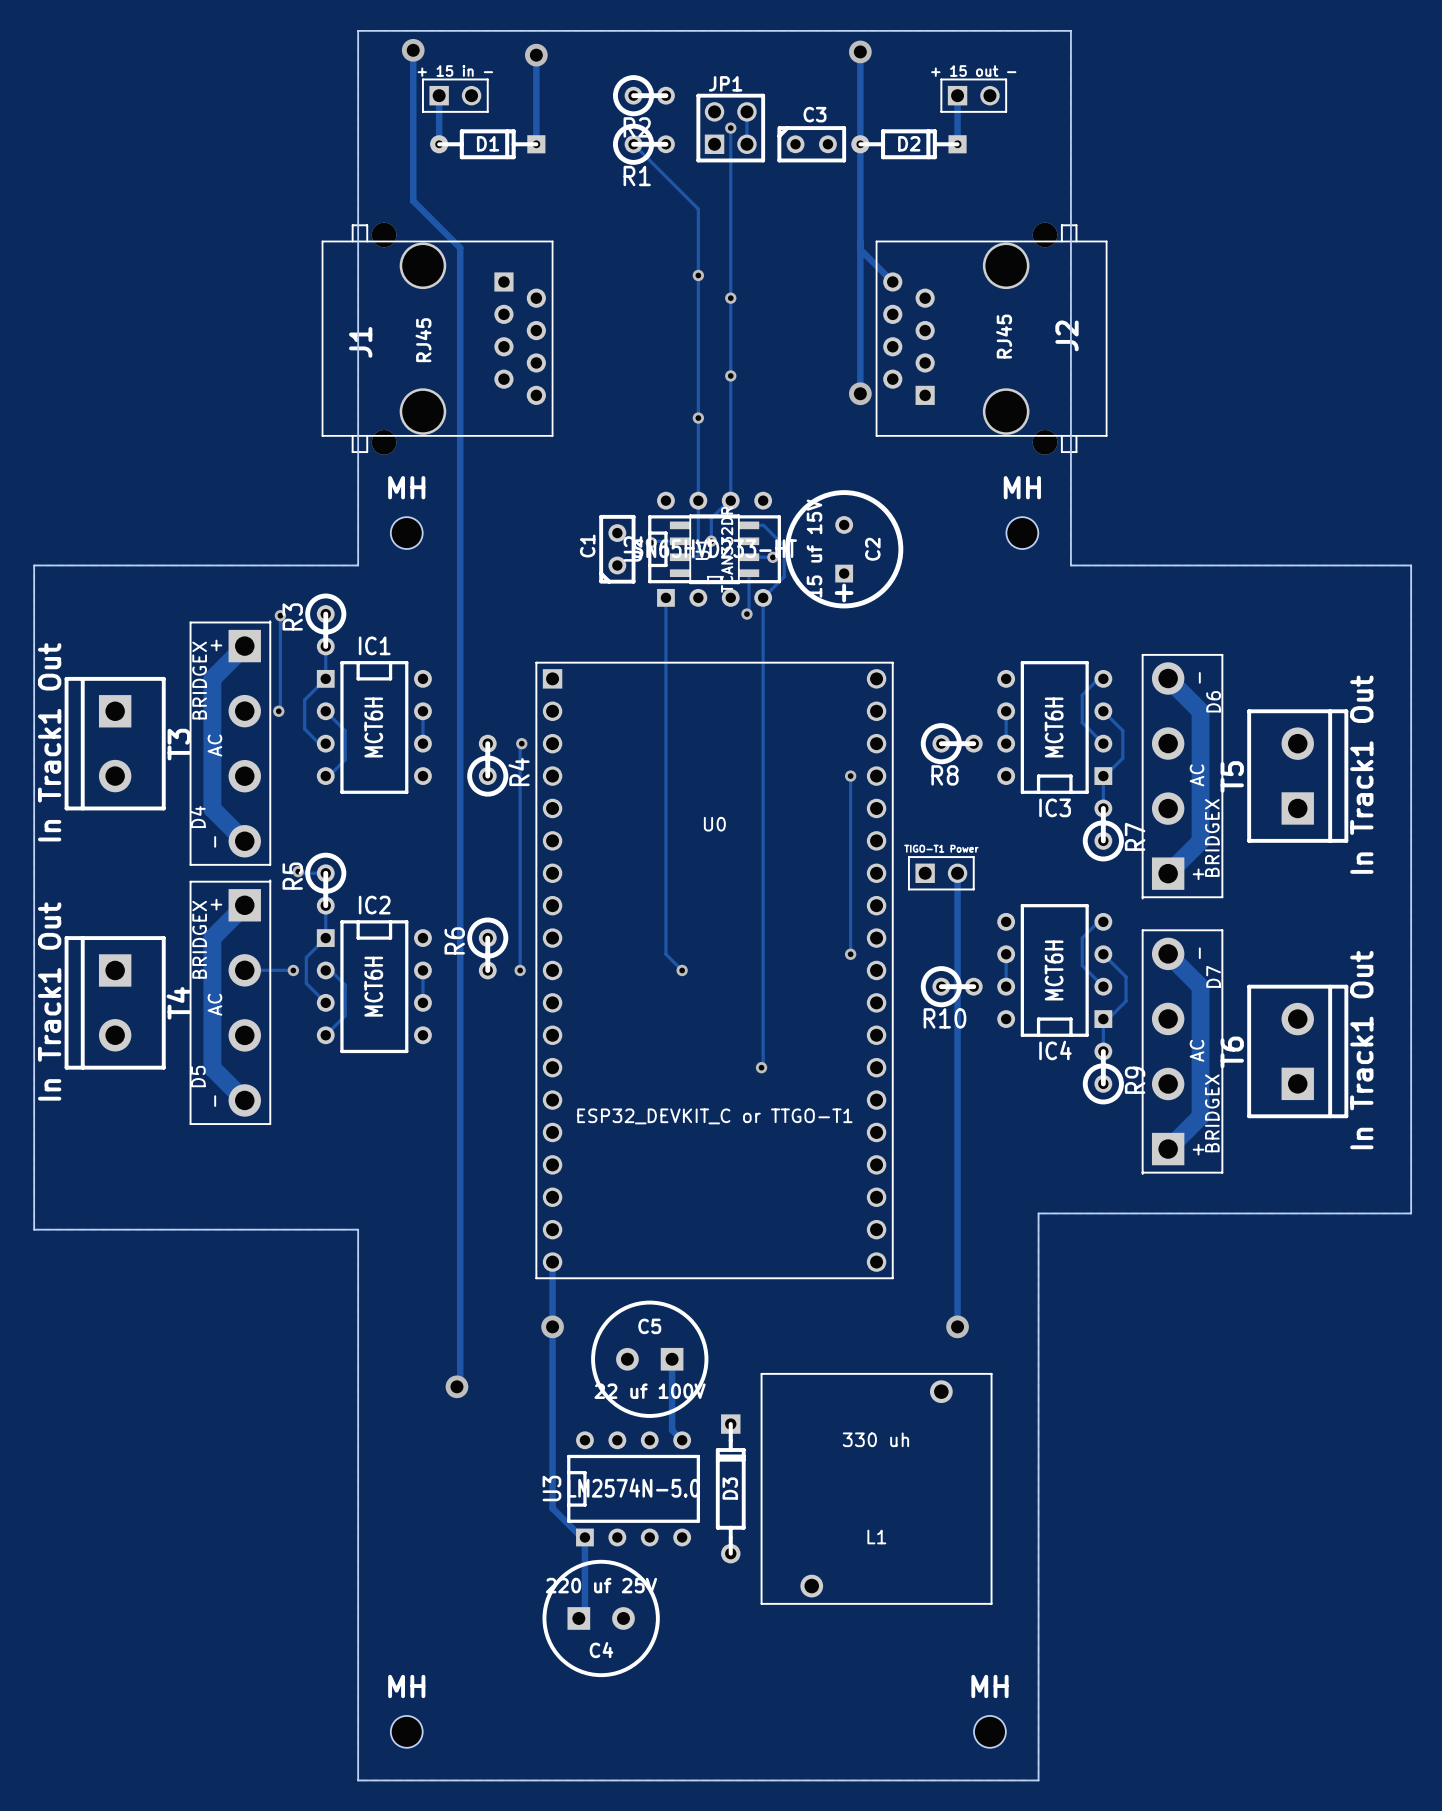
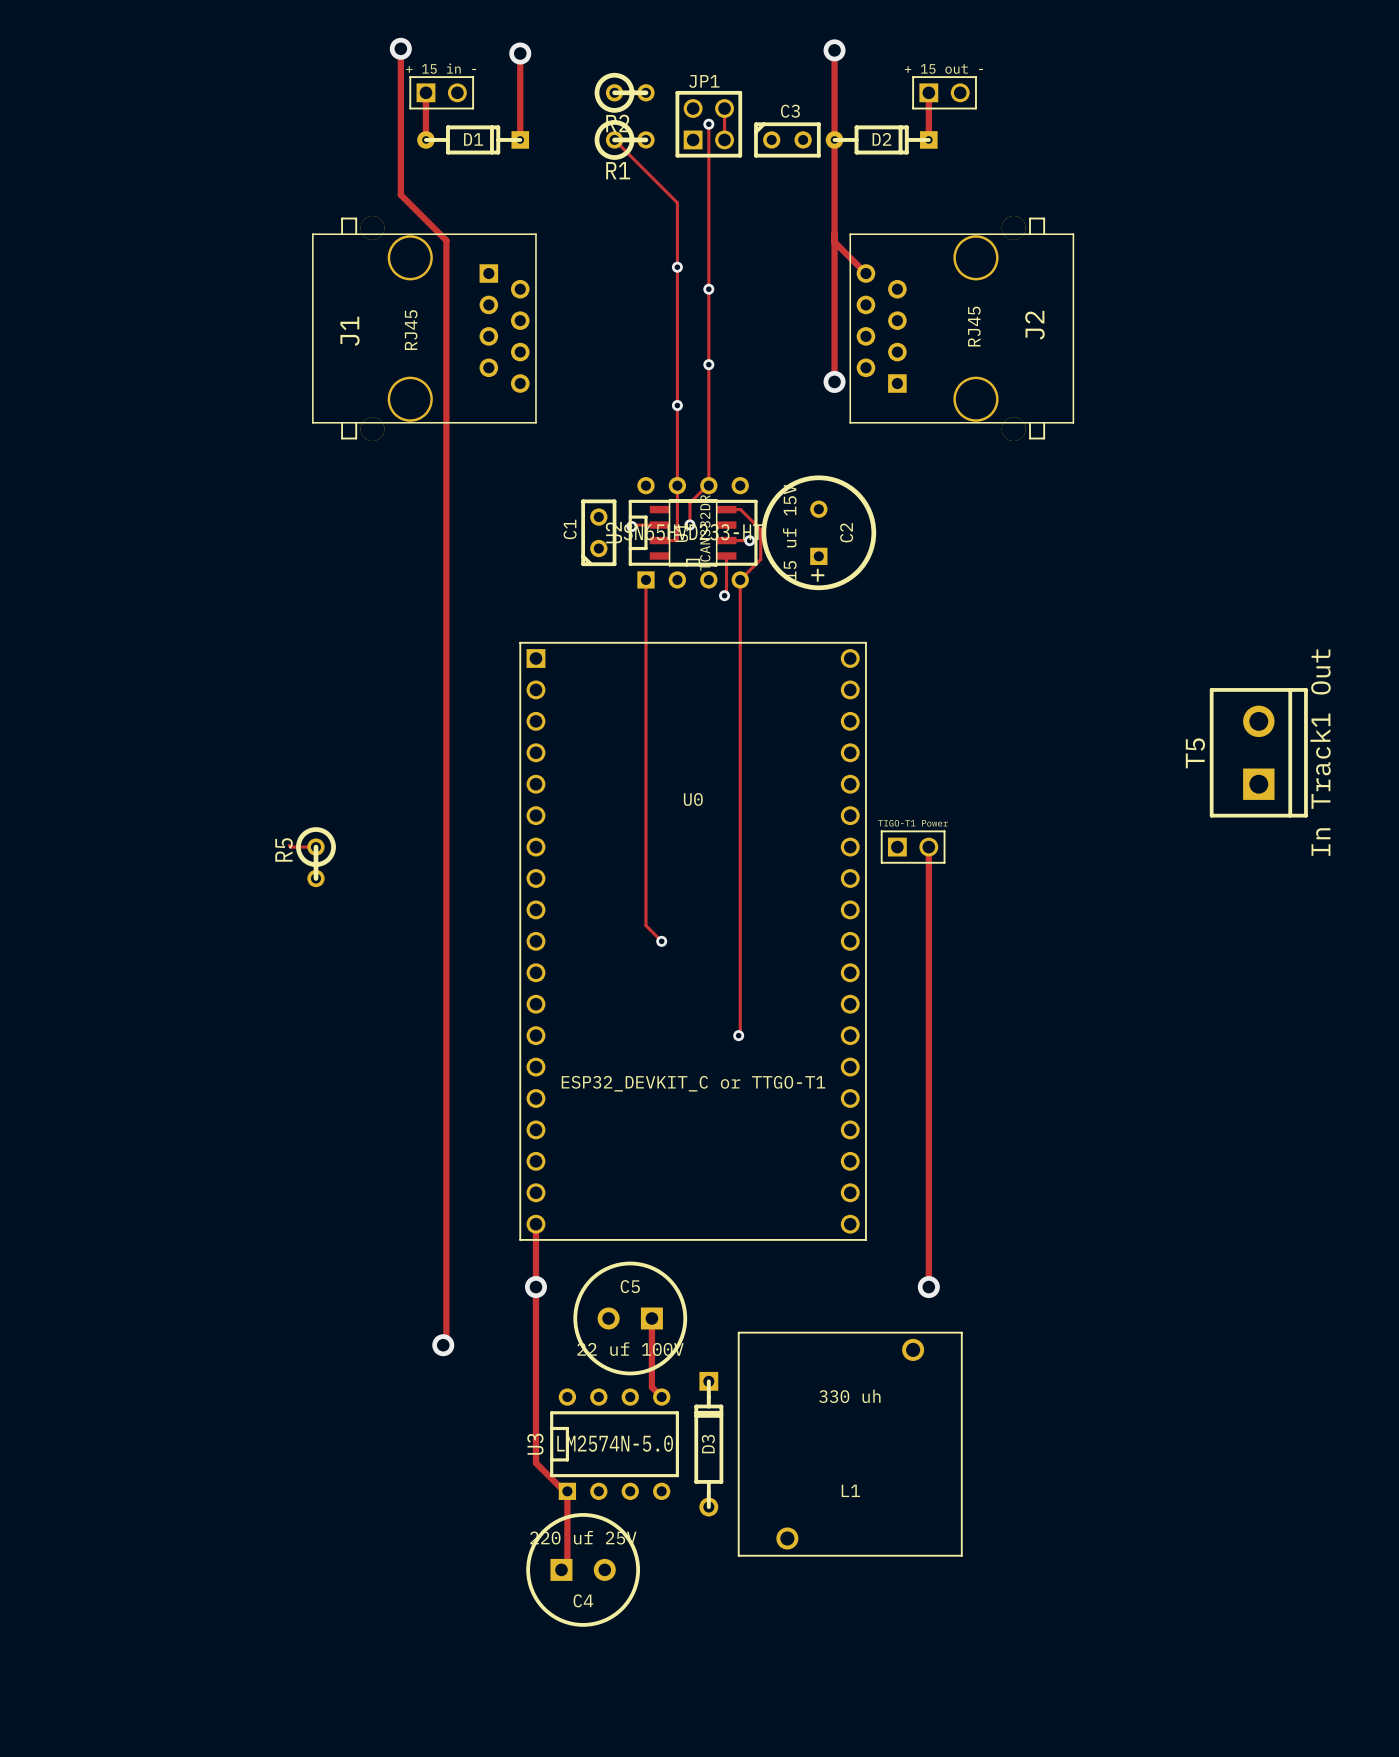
board edge: (358, 30) (358, 565) (34, 565) (34, 1229) (358, 1229) (358, 1780) (1038, 1780) (1038, 1213) (1411, 1213) (1411, 565) (1070, 565) (1070, 30) (358, 30) -> none
MH: (406, 533) -> none
MH: (1022, 533) -> none
track: (280, 615) (280, 709) (278, 711) -> none
via: (280, 615) -> none
R3: (325, 624) -> none
track: (244, 646) (212, 678) (212, 808) (244, 841) -> none
track: (325, 646) (325, 678) (304, 699) (304, 729) (319, 743) (325, 743) -> none
track: (1103, 678) (1098, 678) (1082, 695) (1082, 722) (1103, 743) -> none
track: (1168, 678) (1200, 711) (1200, 841) (1168, 873) -> none
via: (278, 711) -> none
track: (325, 711) (345, 730) (345, 759) (329, 776) (325, 776) -> none
track: (422, 711) (422, 743) -> none
track: (1006, 711) (1006, 743) -> none
track: (1103, 711) (1122, 730) (1122, 758) (1103, 776) (1103, 808) -> none
IC1: MCT6H (374, 727) -> none
IC3: MCT6H (1054, 727) -> none
T3: In Track1 Out (115, 743) -> none
D4: BRIDGEX (230, 743) -> none
track: (521, 743) (520, 745) (520, 970) -> none
via: (521, 743) -> none
R8: (951, 743) -> none
R4: (487, 765) -> none
track: (850, 776) (850, 954) -> none
via: (850, 776) -> none
D6: BRIDGEX (1182, 776) -> none
R7: (1103, 830) -> none
via: (298, 871) -> none
track: (244, 905) (212, 938) (212, 1068) (244, 1100) -> none
track: (325, 905) (325, 938) (306, 957) (306, 983) (325, 1002) -> none
track: (1103, 921) (1098, 921) (1082, 938) (1082, 965) (1103, 986) -> none
R6: (487, 948) -> none
track: (1168, 953) (1200, 986) (1200, 1116) (1168, 1149) -> none
via: (850, 954) -> none
track: (1006, 954) (1006, 986) -> none
track: (1103, 954) (1126, 976) (1126, 1001) (1108, 1019) (1103, 1019) (1103, 1051) -> none
track: (244, 970) (293, 970) -> none
via: (293, 970) -> none
track: (325, 970) (330, 970) (345, 985) (345, 1015) (325, 1035) -> none
track: (422, 970) (422, 1002) -> none
via: (520, 970) -> none
IC4: MCT6H (1054, 970) -> none
IC2: MCT6H (374, 986) -> none
R10: (951, 986) -> none
T4: In Track1 Out (115, 1002) -> none
D5: BRIDGEX (230, 1002) -> none
T6: In Track1 Out (1297, 1051) -> none
D7: BRIDGEX (1182, 1052) -> none
R9: (1103, 1073) -> none
MH: (406, 1731) -> none
MH: (989, 1731) -> none

